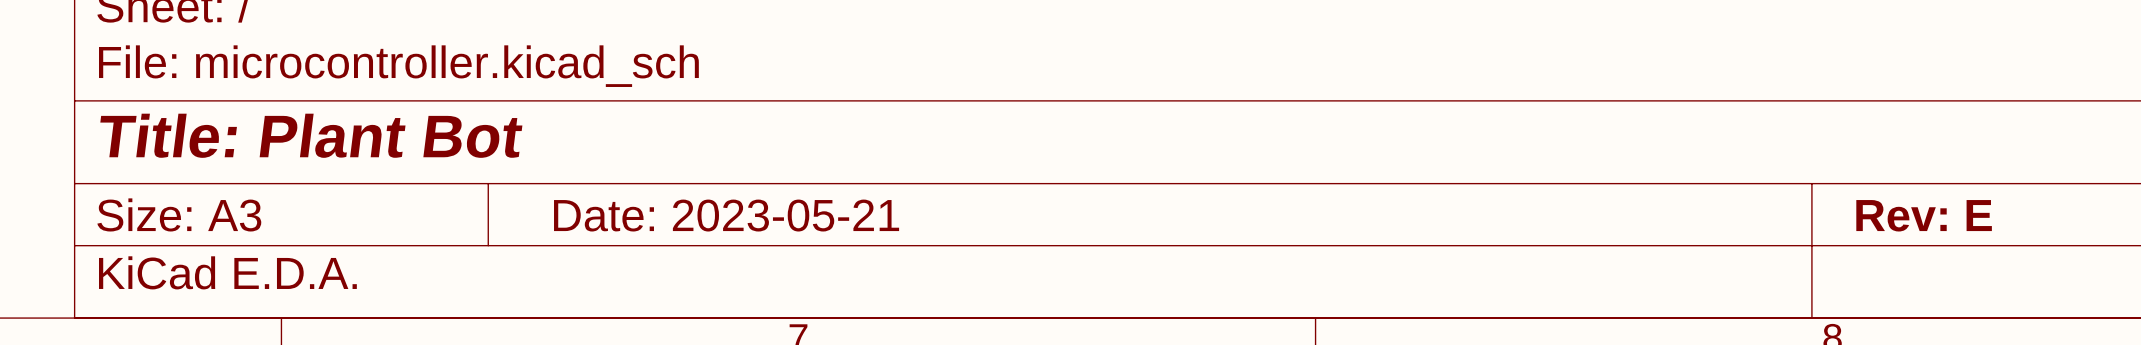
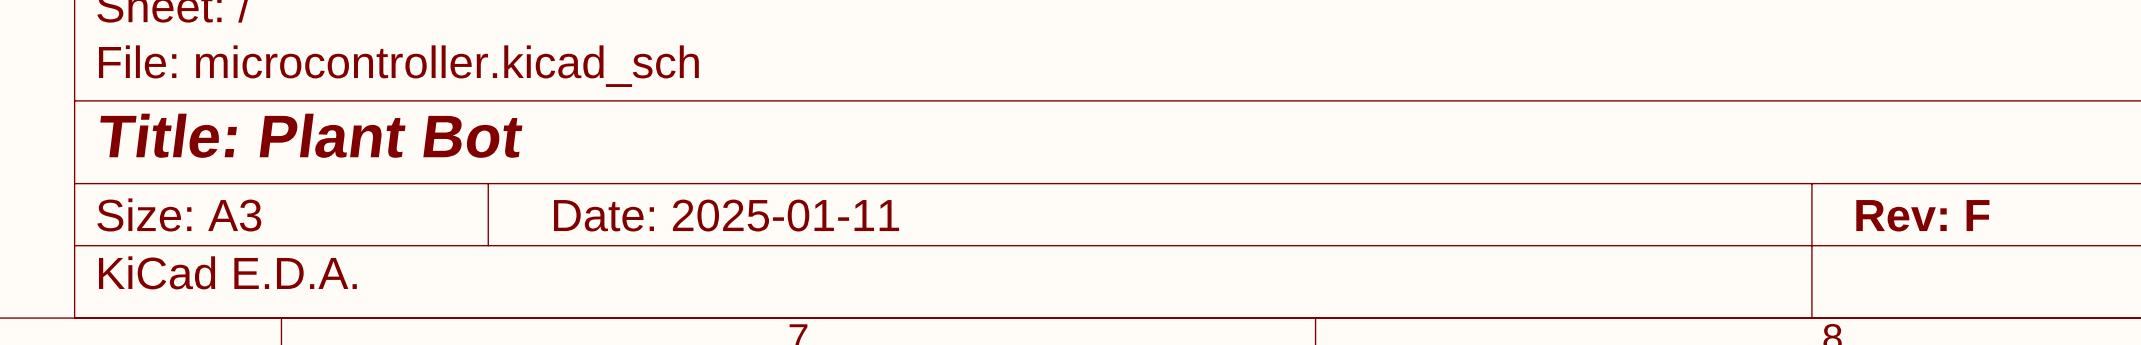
title block: Date: 2023-05-21 (726, 215) -> Date: 2025-01-11 (726, 215)
title block: Rev: E (1924, 215) -> Rev: F (1922, 215)

